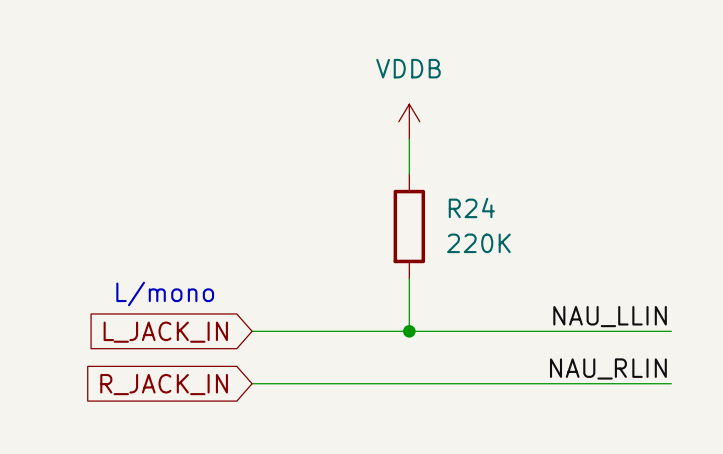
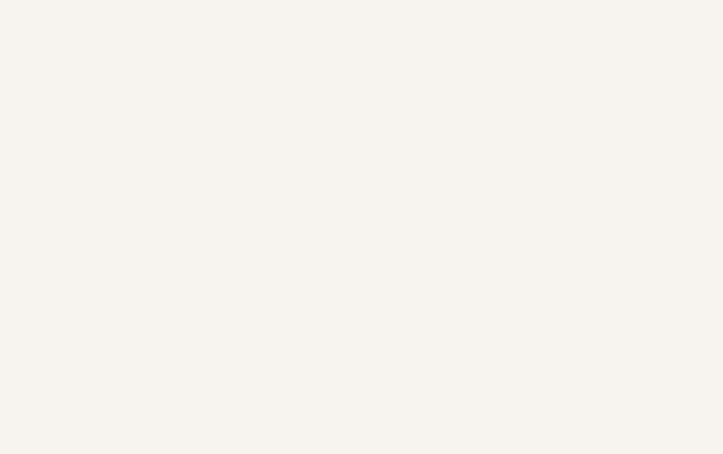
power symbol: VDDB (409, 121) -> none
wire: (409, 139) (409, 174) -> none
R24: 220K (409, 226) -> none
wire: (409, 278) (409, 331) -> none
text: L/mono (165, 293) -> none
label: NAU_LLIN (610, 316) -> none
wire: (252, 331) (671, 331) -> none
junction: (409, 331) -> none
global label: L_JACK_IN (165, 332) -> none
label: NAU_RLIN (608, 368) -> none
wire: (252, 383) (671, 383) -> none
global label: R_JACK_IN (164, 384) -> none

